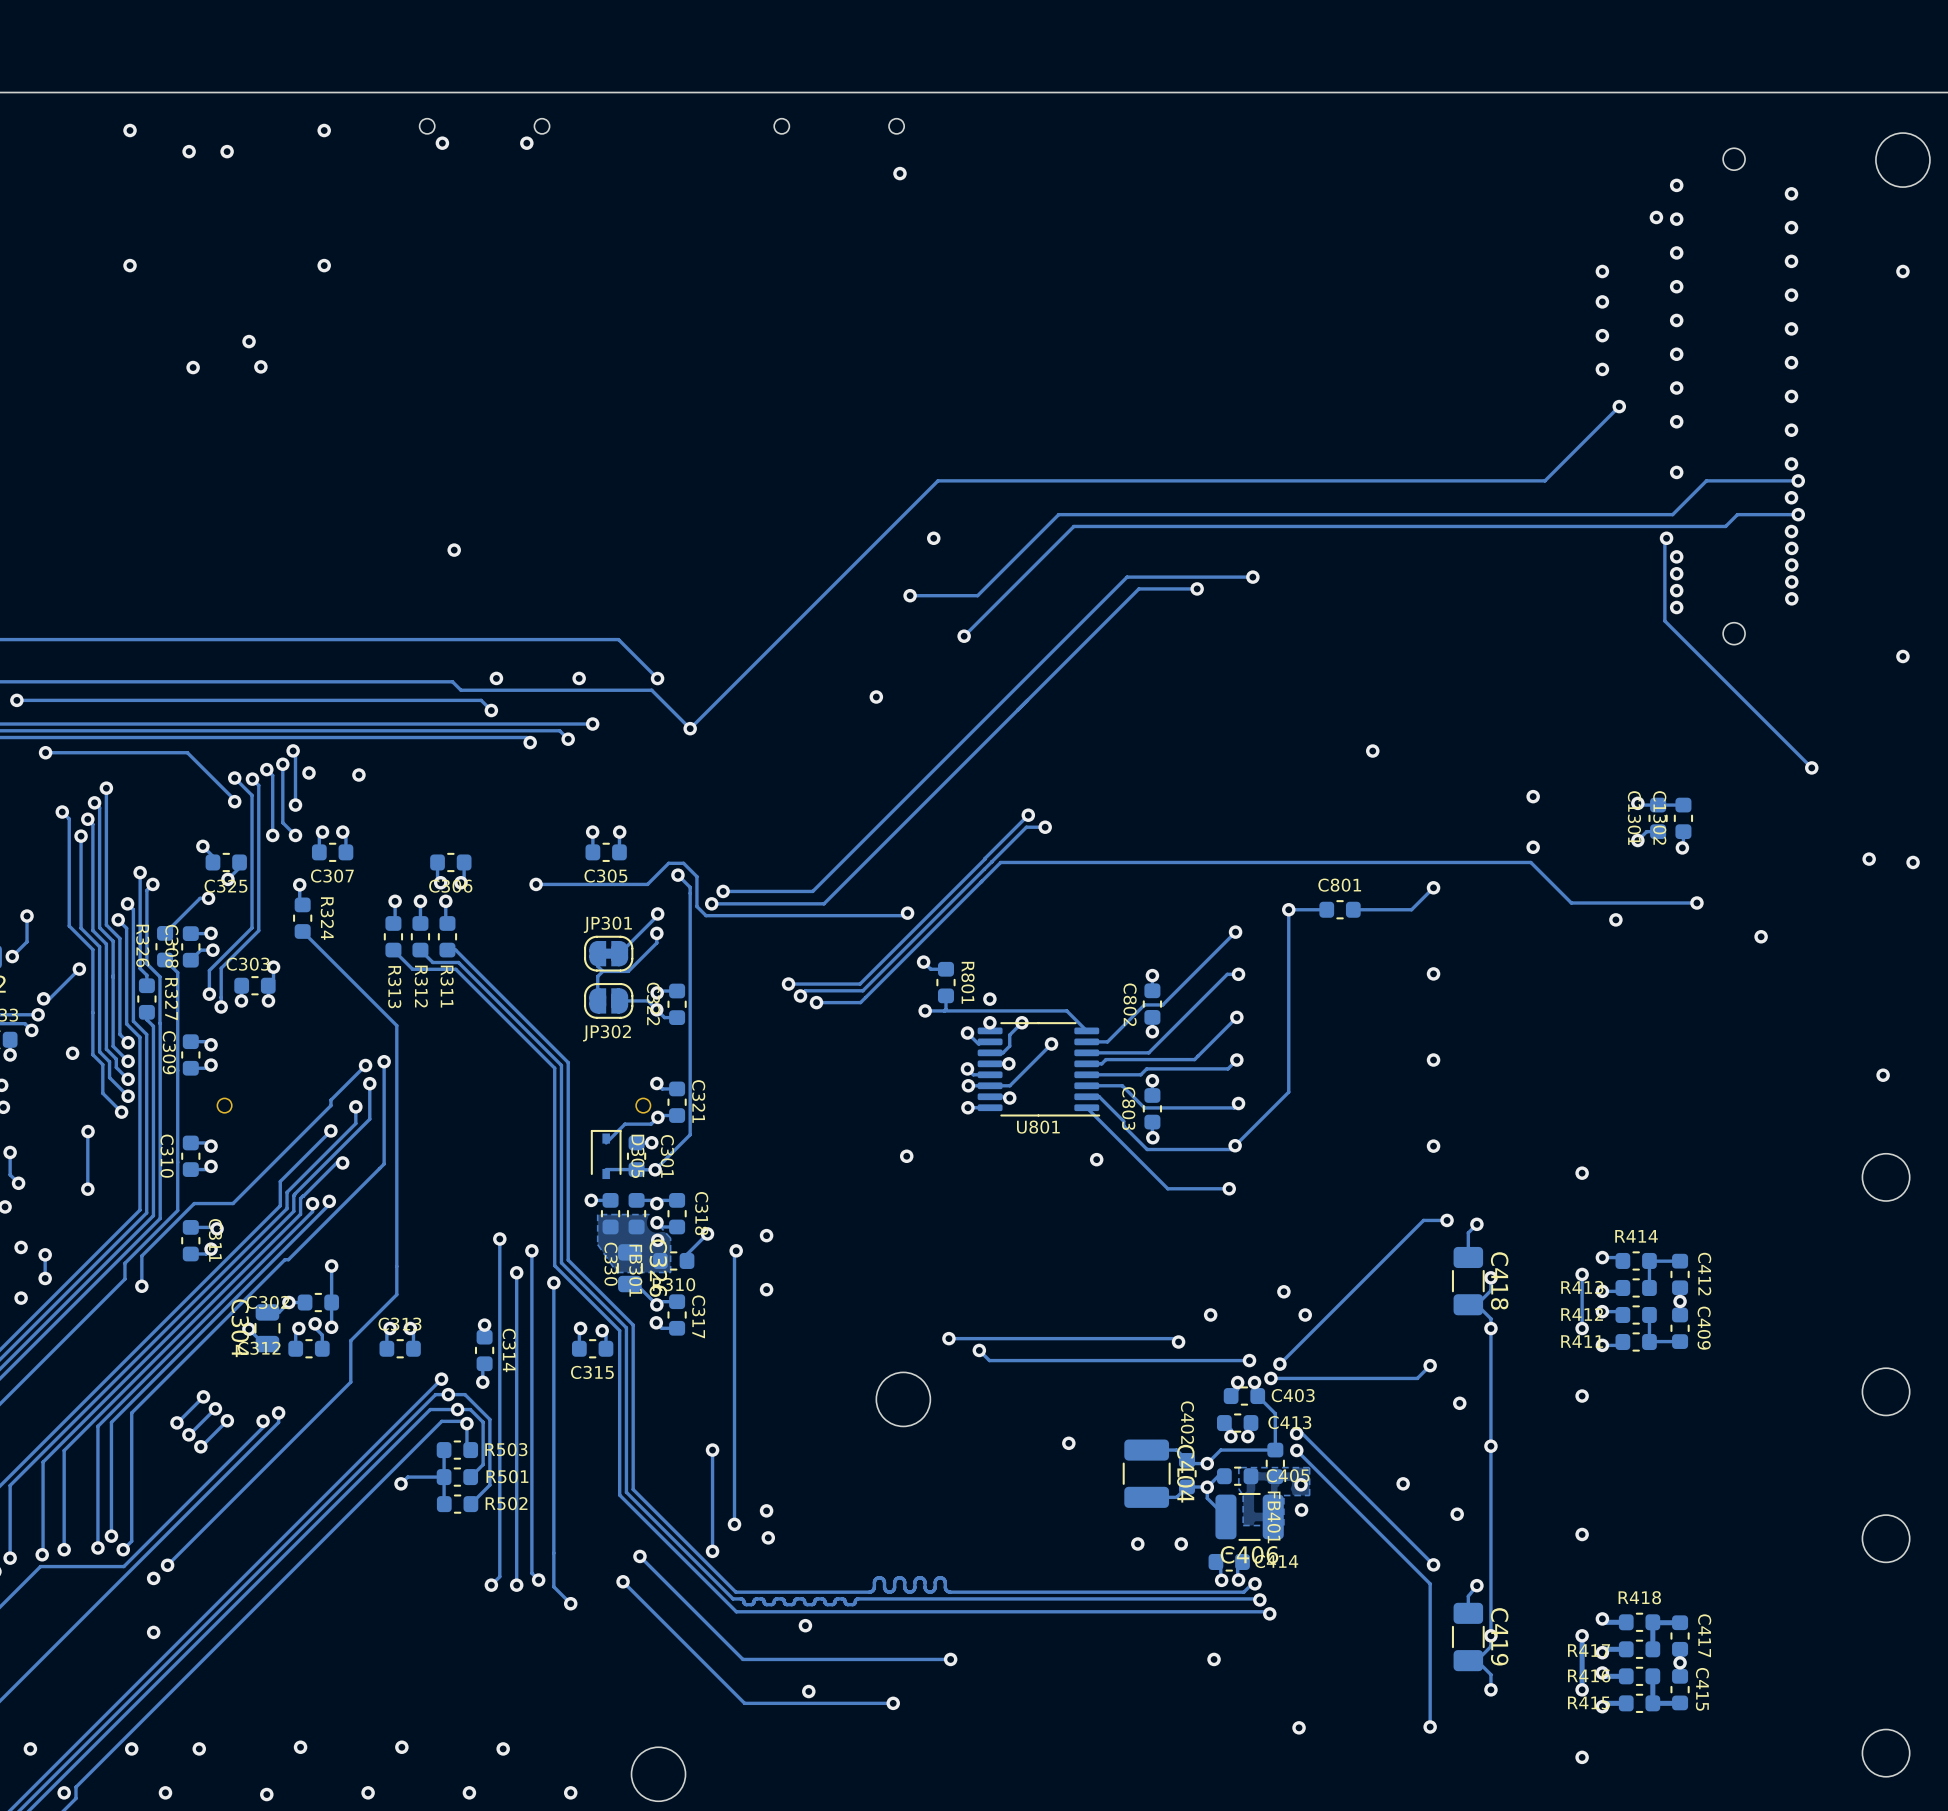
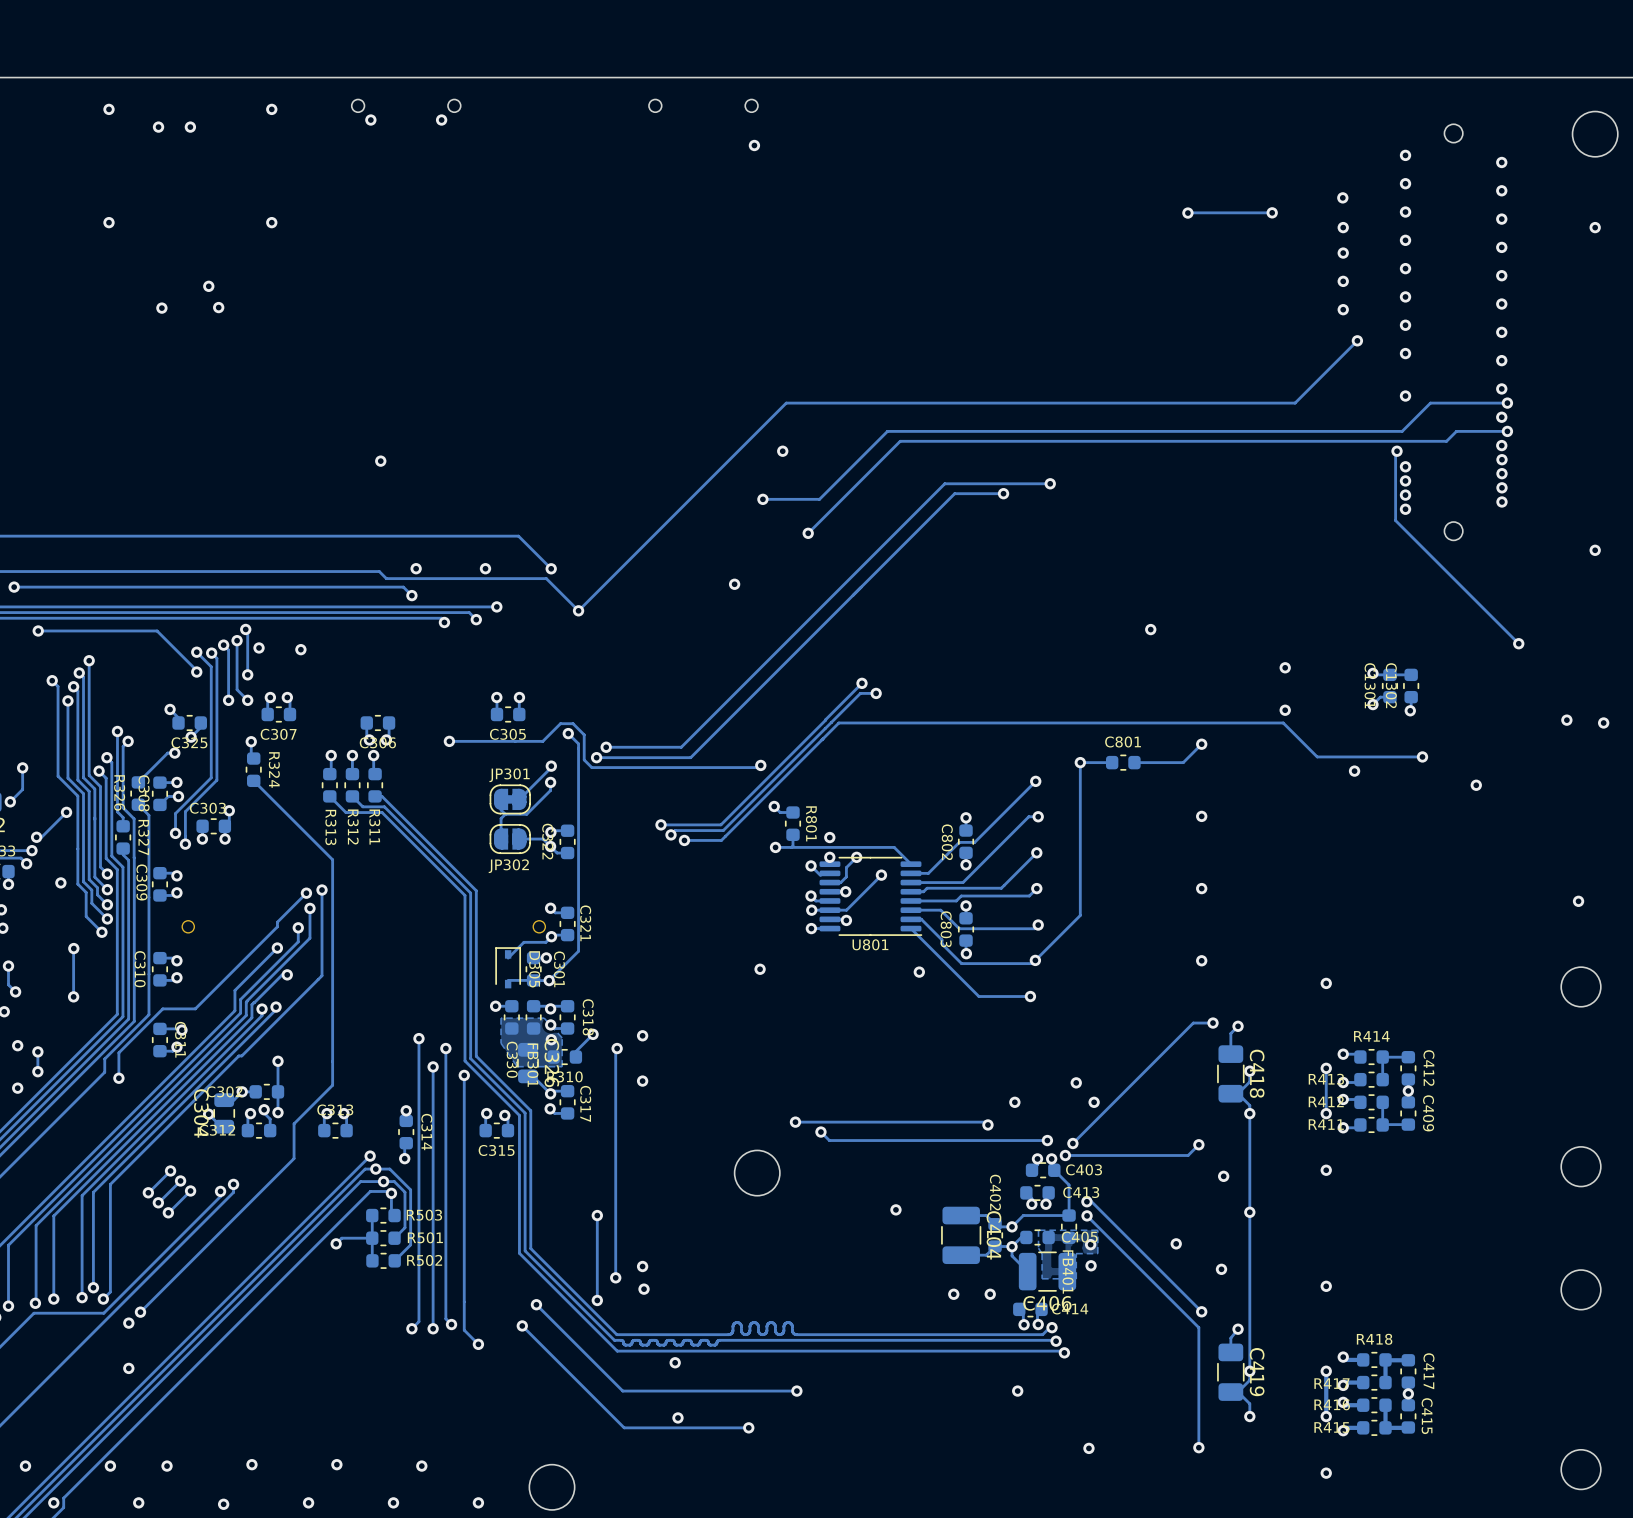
via position: (1656, 217) -> (1342, 197)
track: none -> (1272, 212) (1187, 213)
via: none -> (1272, 212)
via: none -> (1187, 213)

